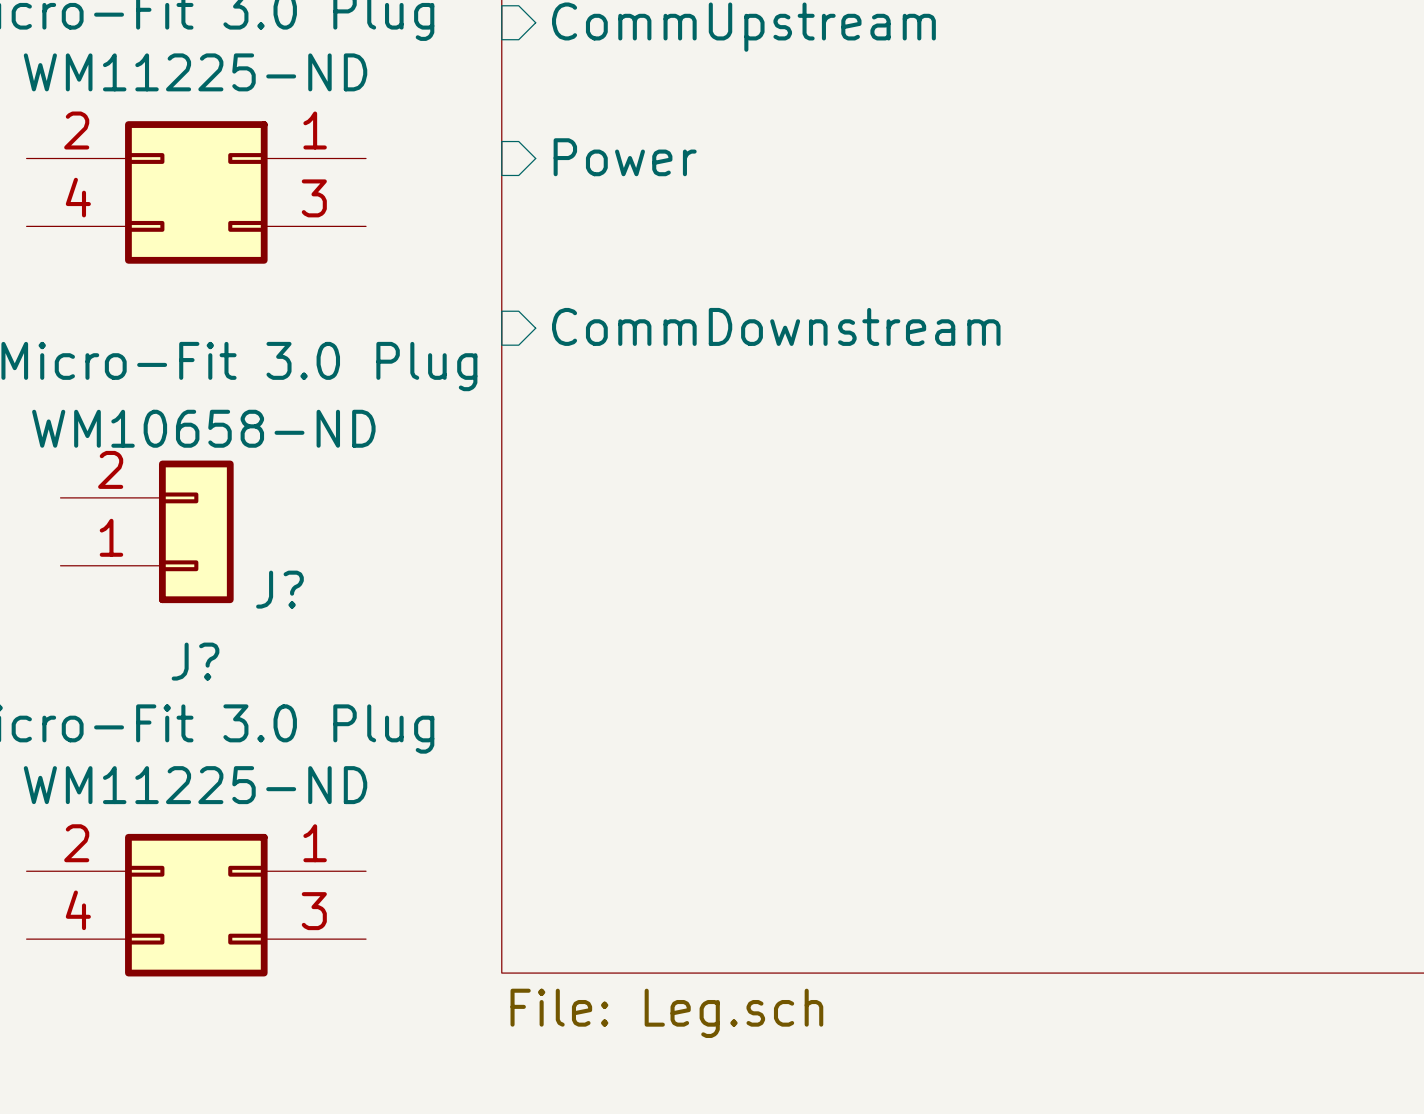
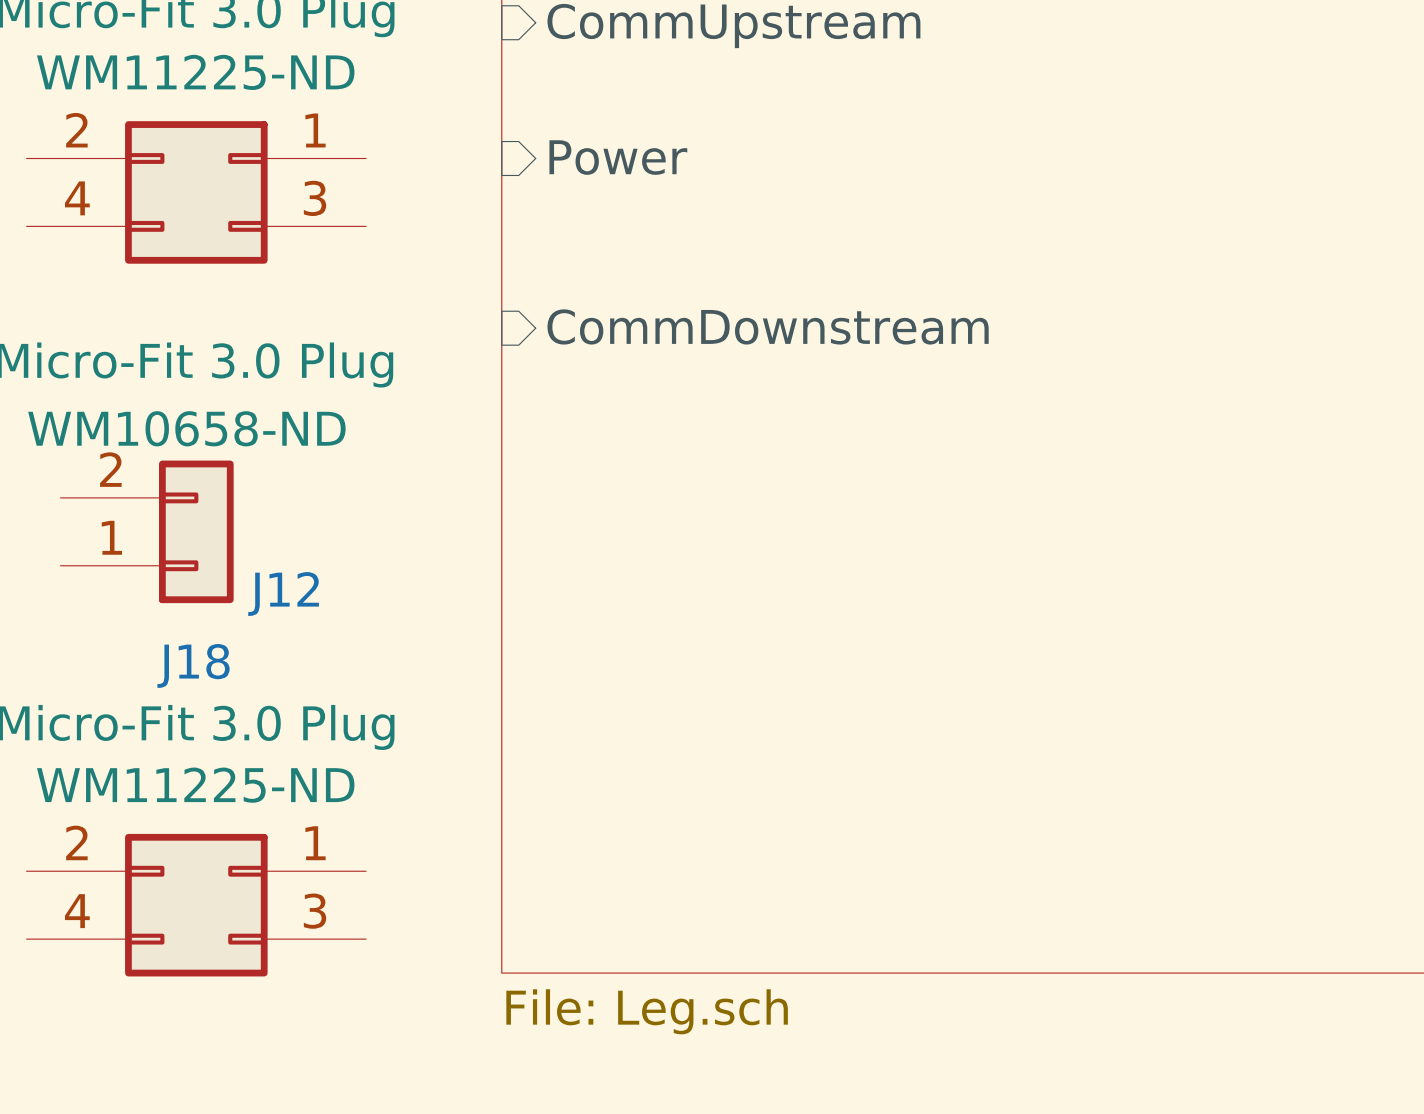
J? name: J? (279, 589) -> J12 (283, 593)
J? name: J? (195, 661) -> J18 (193, 665)

